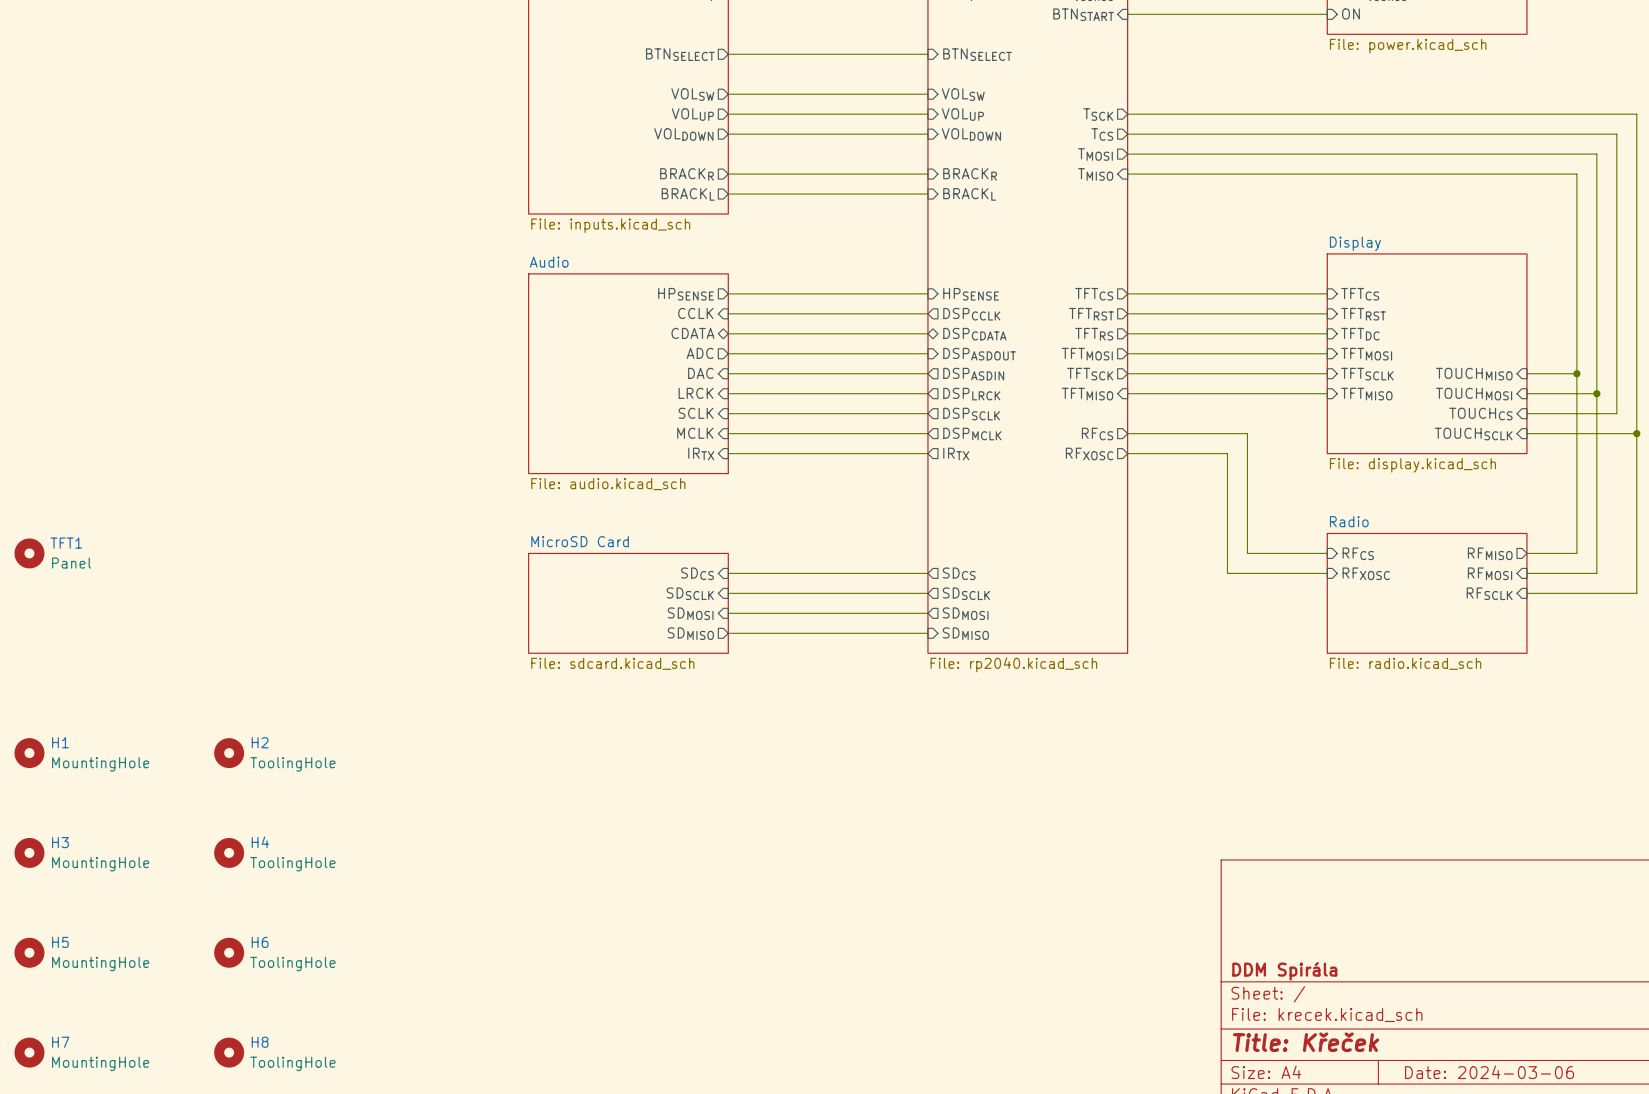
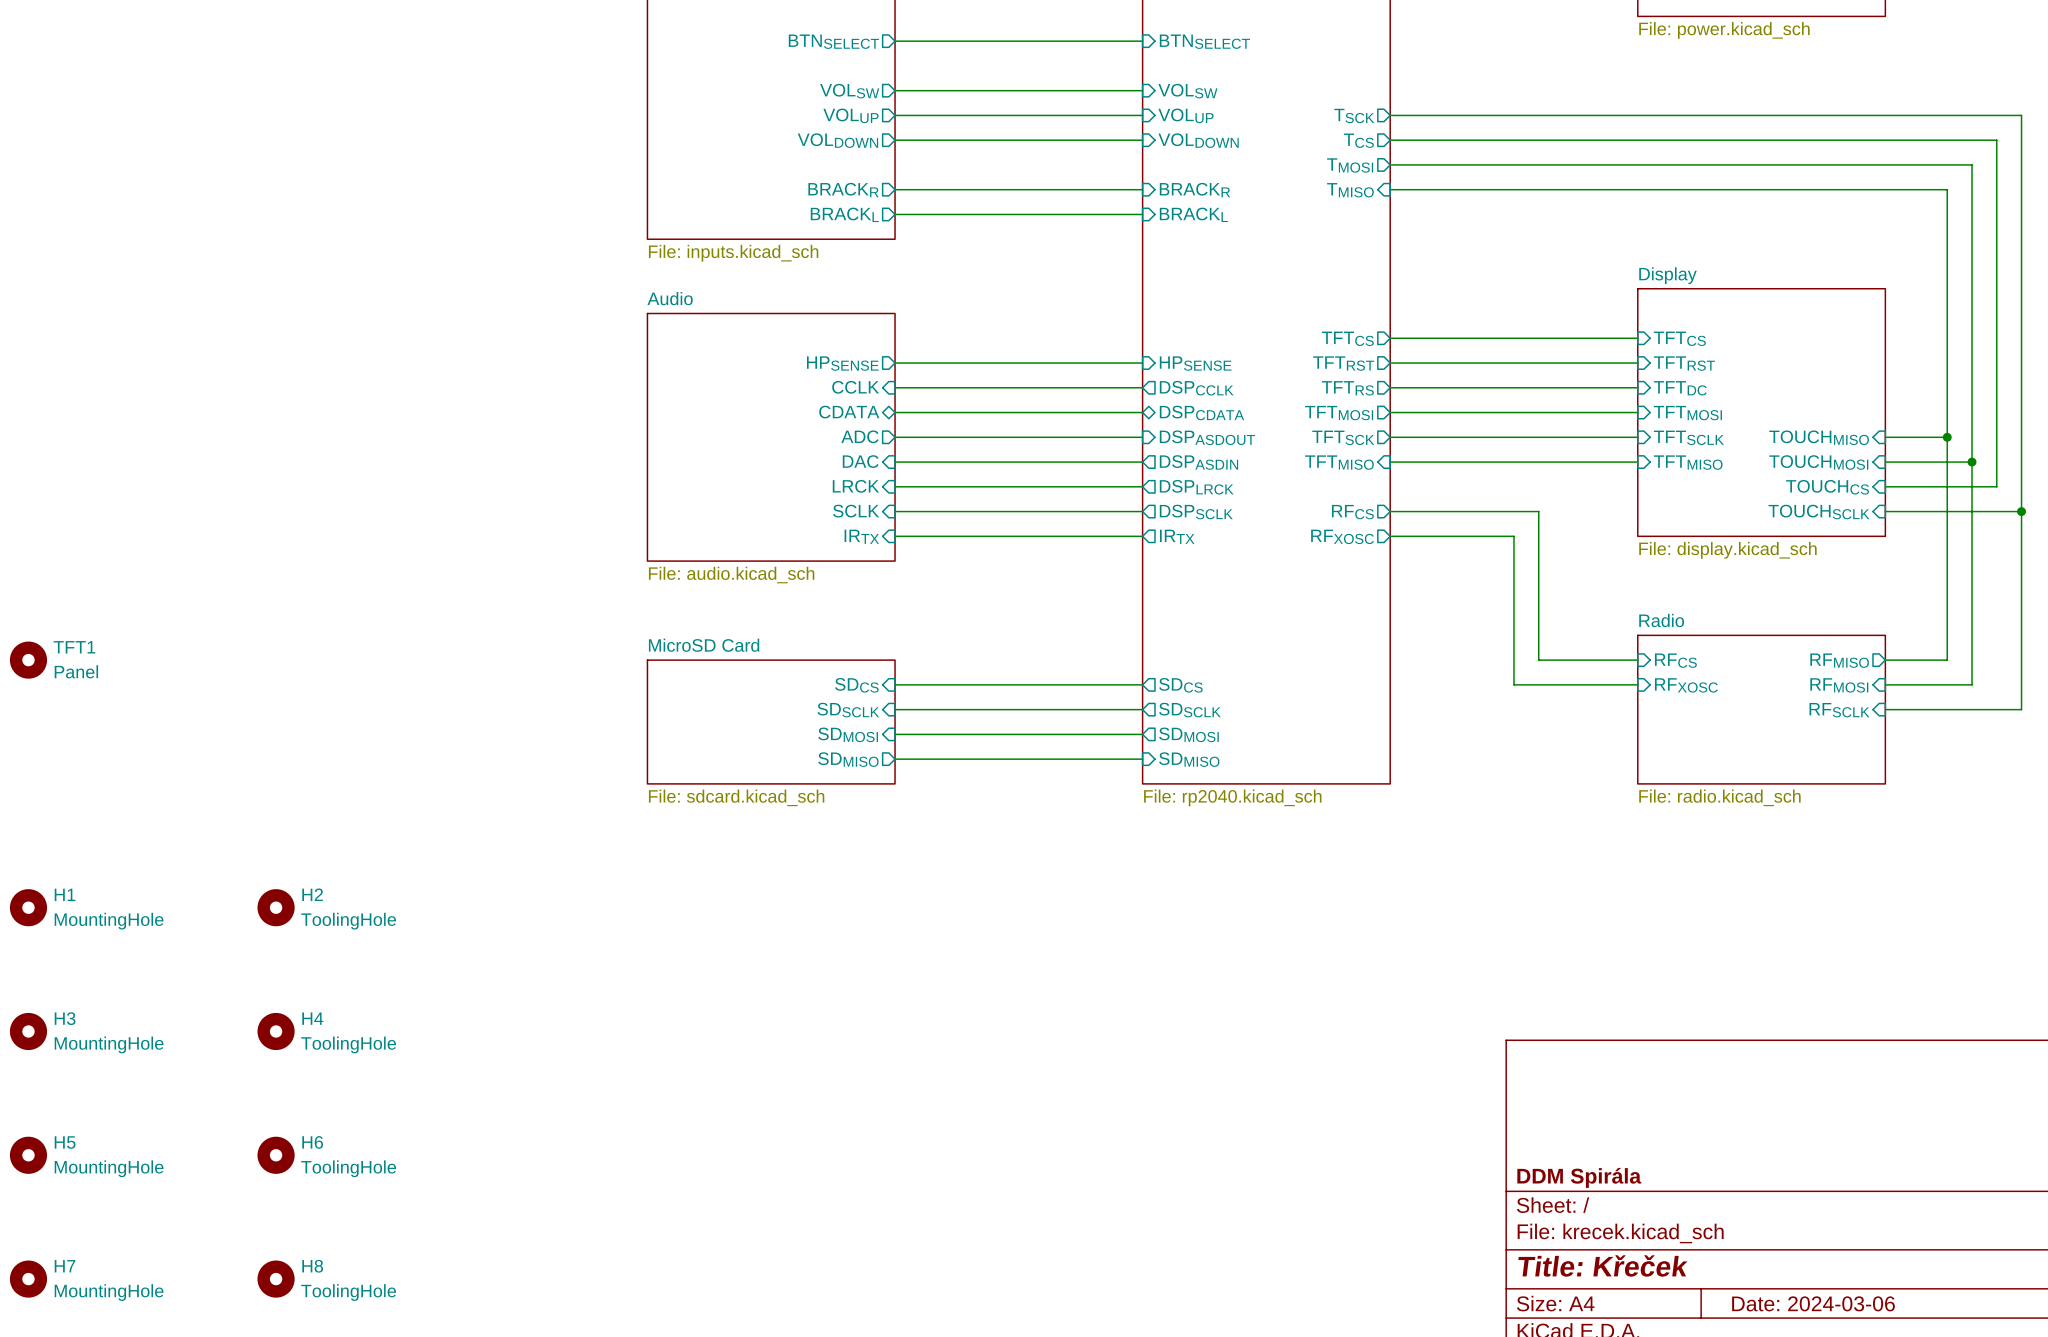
wire: (728, 293) (927, 293) -> none
sheet pin: HPSENSE (686, 294) -> none
sheet pin: HPSENSE (971, 294) -> none
sheet pin shape: input (695, 313) -> output (842, 363)
sheet pin: CCLK (695, 313) -> HPSENSE (842, 363)
sheet pin shape: output (971, 314) -> input (1195, 363)
sheet pin: DSPCCLK (971, 314) -> HPSENSE (1195, 363)
sheet pin shape: bidirectional (692, 333) -> input (855, 387)
sheet pin: CDATA (692, 333) -> CCLK (855, 387)
sheet pin shape: bidirectional (974, 334) -> output (1196, 388)
sheet pin: DSPCDATA (974, 334) -> DSPCCLK (1196, 388)
sheet pin shape: output (700, 353) -> bidirectional (849, 412)
sheet pin: ADC (700, 353) -> CDATA (849, 412)
sheet pin shape: input (979, 354) -> bidirectional (1201, 412)
sheet pin: DSPASDOUT (979, 354) -> DSPCDATA (1201, 412)
sheet pin shape: input (700, 373) -> output (859, 436)
sheet pin: DAC (700, 373) -> ADC (859, 436)
sheet pin shape: output (973, 374) -> input (1207, 437)
sheet pin: DSPASDIN (973, 374) -> DSPASDOUT (1207, 437)
sheet pin: LRCK (696, 393) -> DAC (860, 461)
sheet pin: DSPLRCK (971, 394) -> DSPASDIN (1198, 462)
sheet pin: SCLK (696, 413) -> LRCK (855, 486)
sheet pin: DSPSCLK (971, 414) -> DSPLRCK (1196, 487)
sheet pin: MCLK (695, 433) -> SCLK (856, 511)
sheet pin: DSPMCLK (972, 434) -> DSPSCLK (1196, 512)

